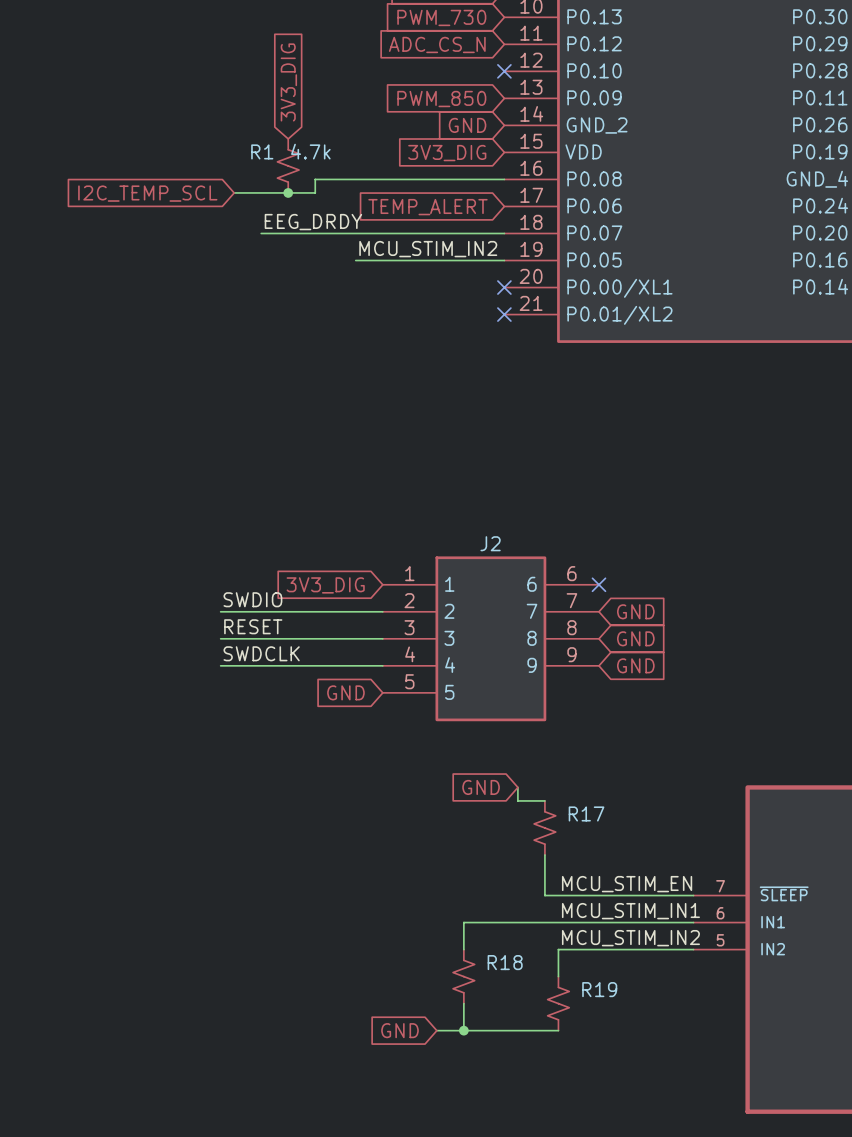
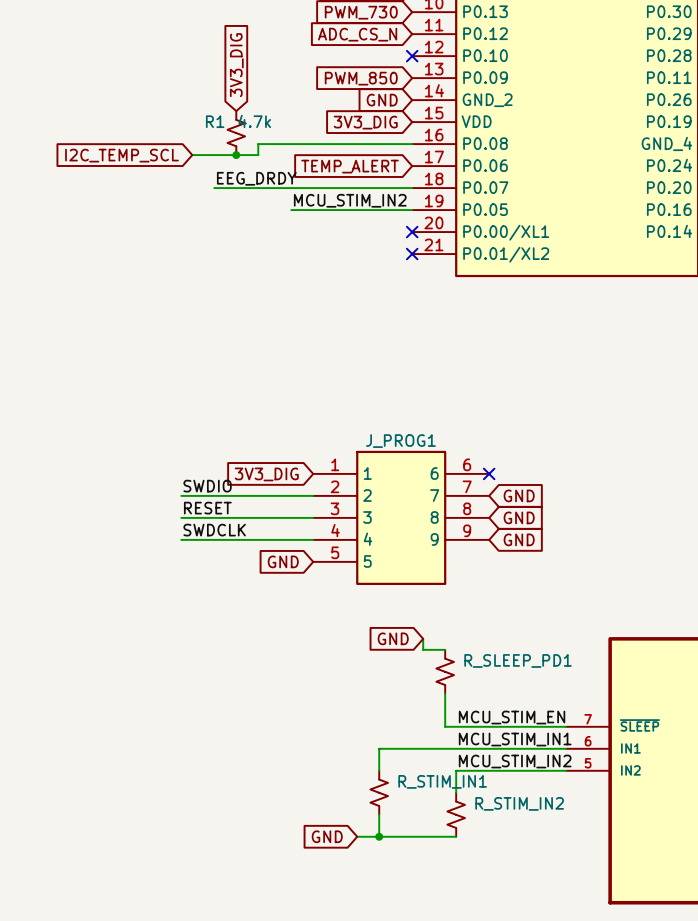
J2 name: J2 (490, 543) -> J_PROG1 (400, 441)
R17 name: R17 (586, 813) -> R_SLEEP_PD1 (518, 660)
R18 name: R18 (505, 962) -> R_STIM_IN1 (442, 781)
R19 name: R19 (599, 989) -> R_STIM_IN2 (519, 803)

